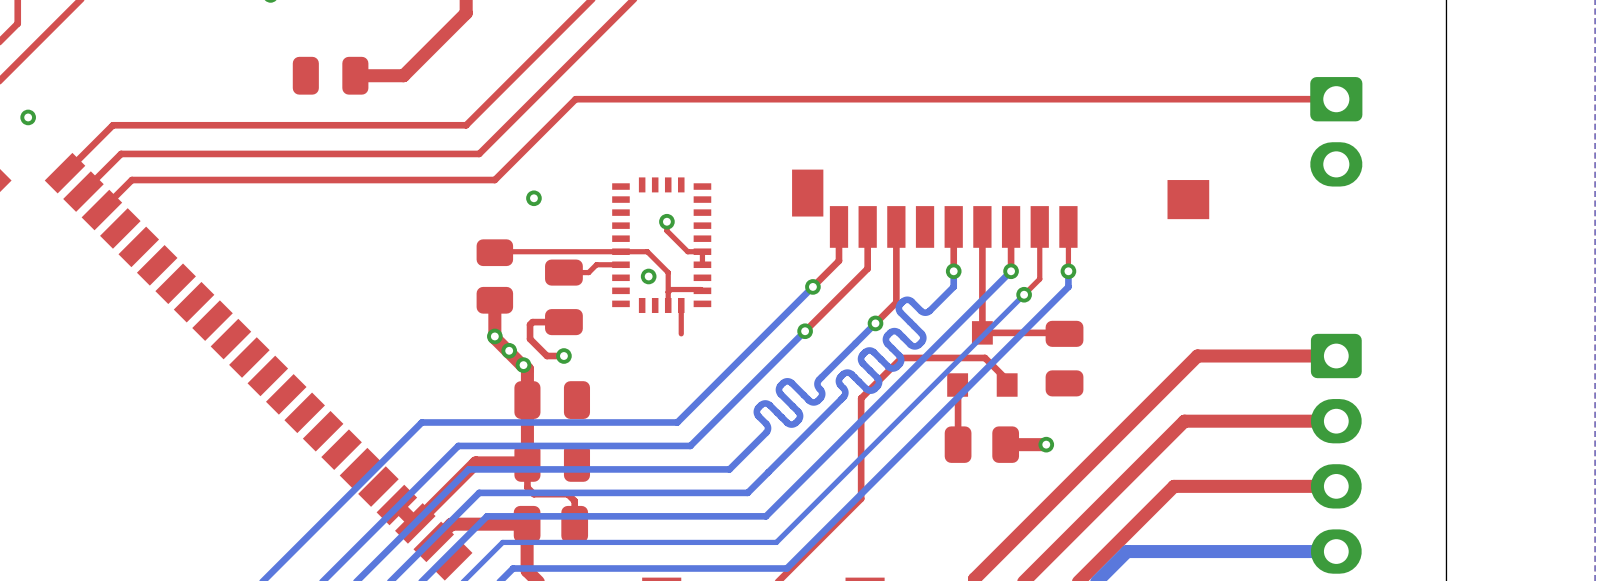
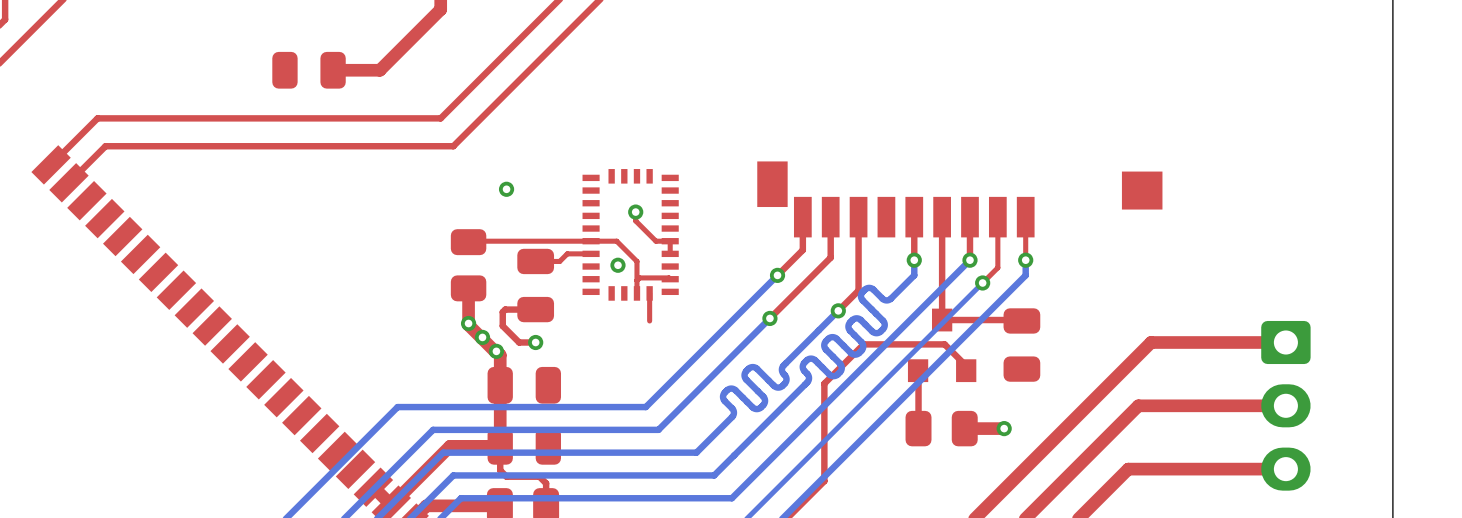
top track: (1336, 99) (575, 99) (494, 180) (131, 180) (101, 210) -> none
via: (28, 117) -> none
part: (1336, 131) -> none

